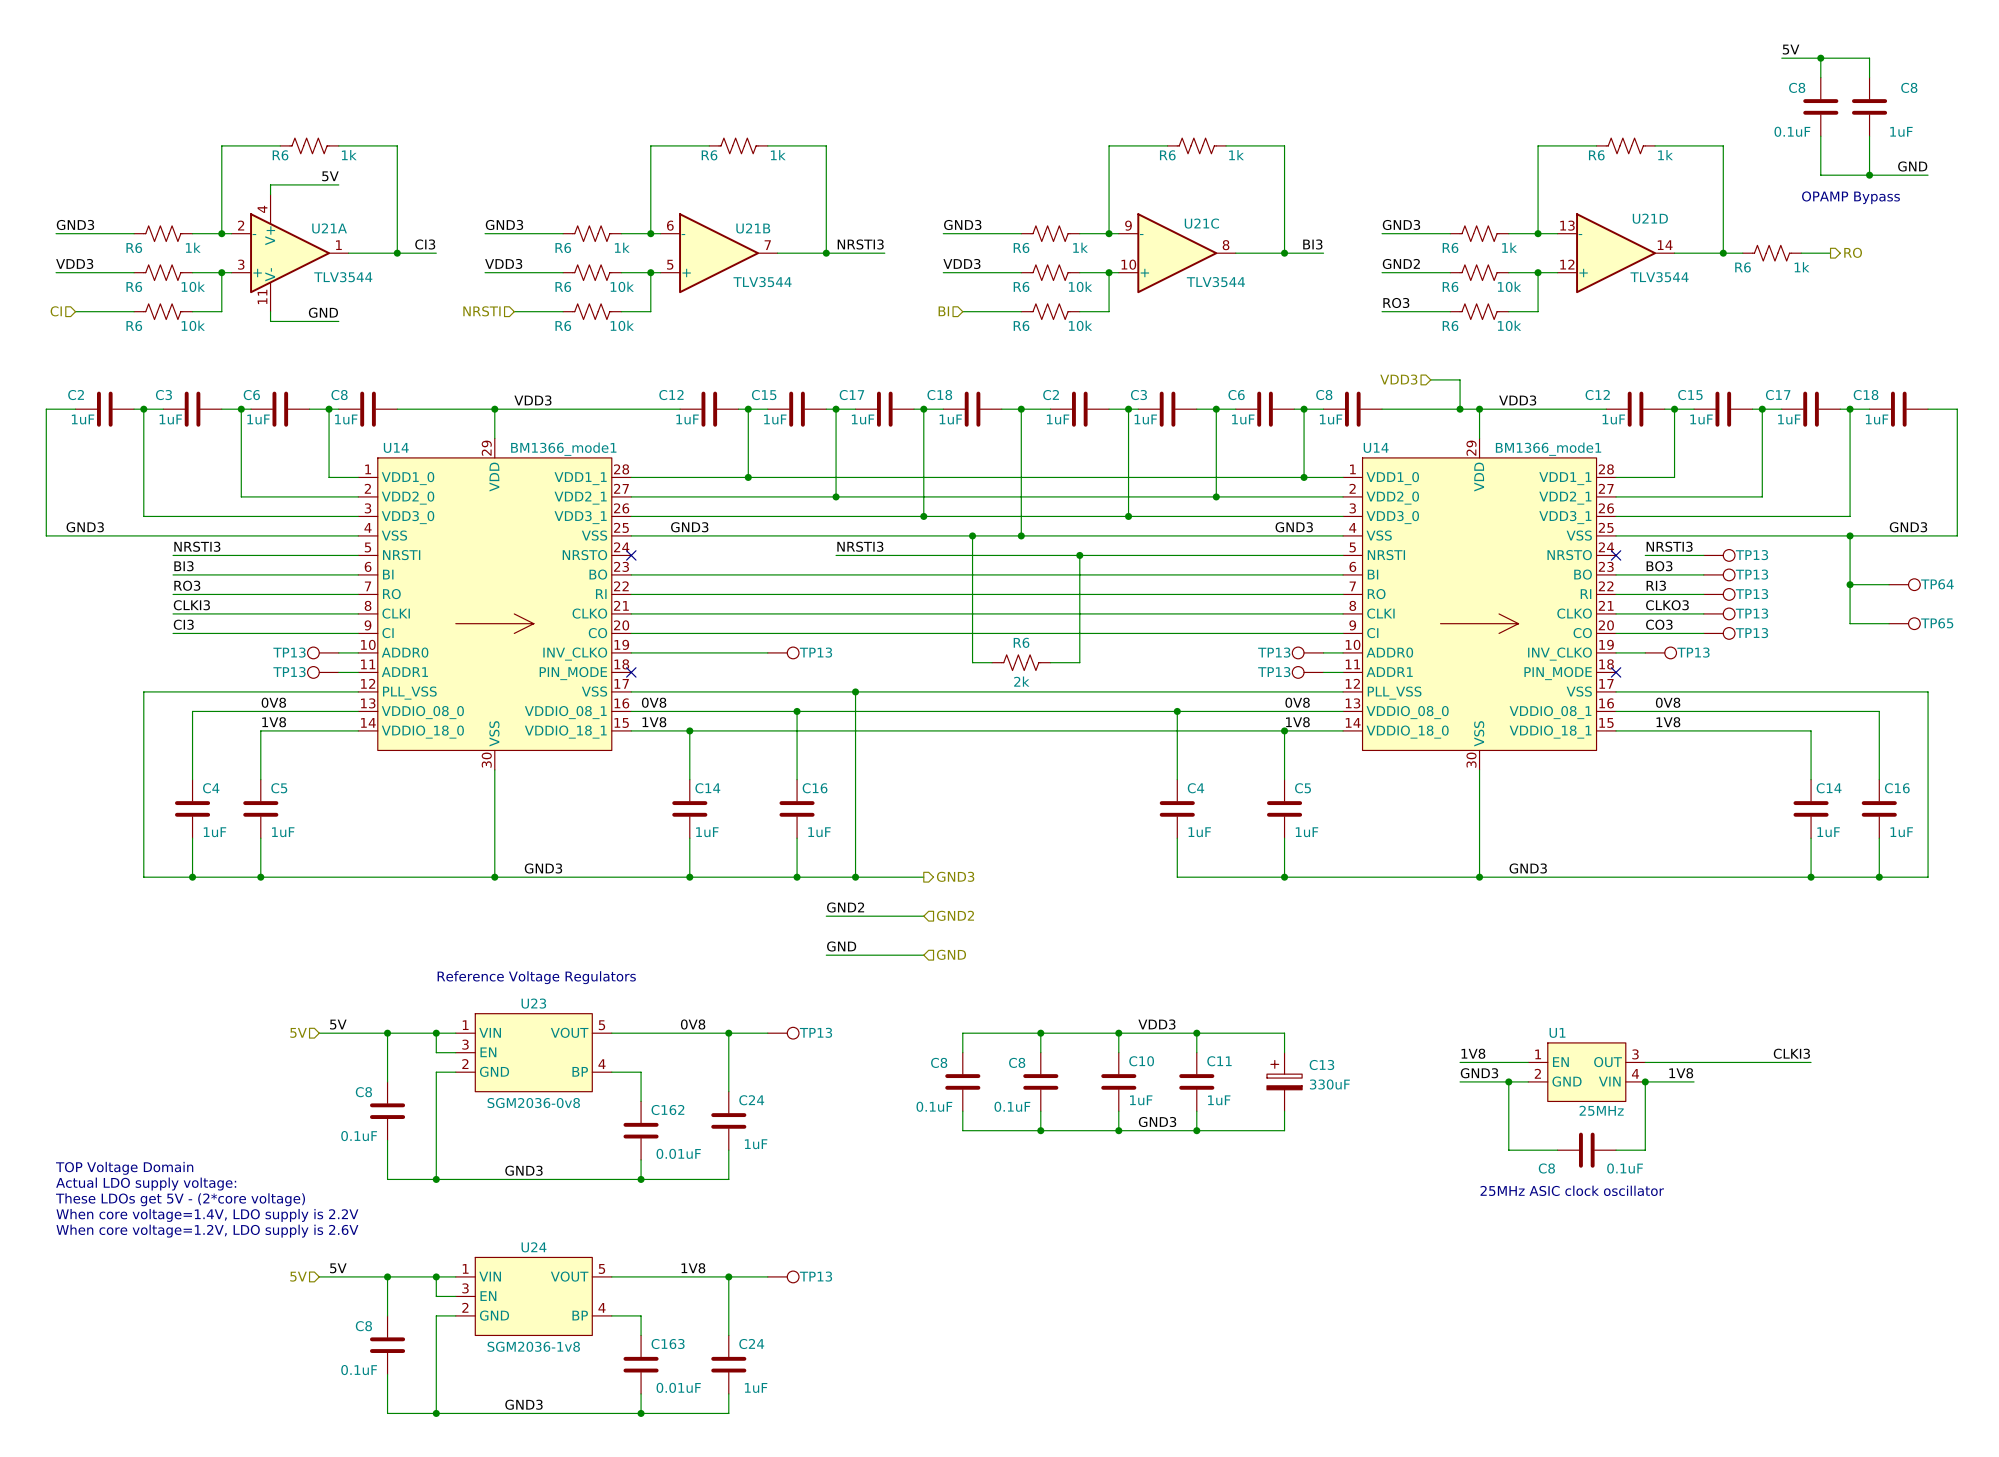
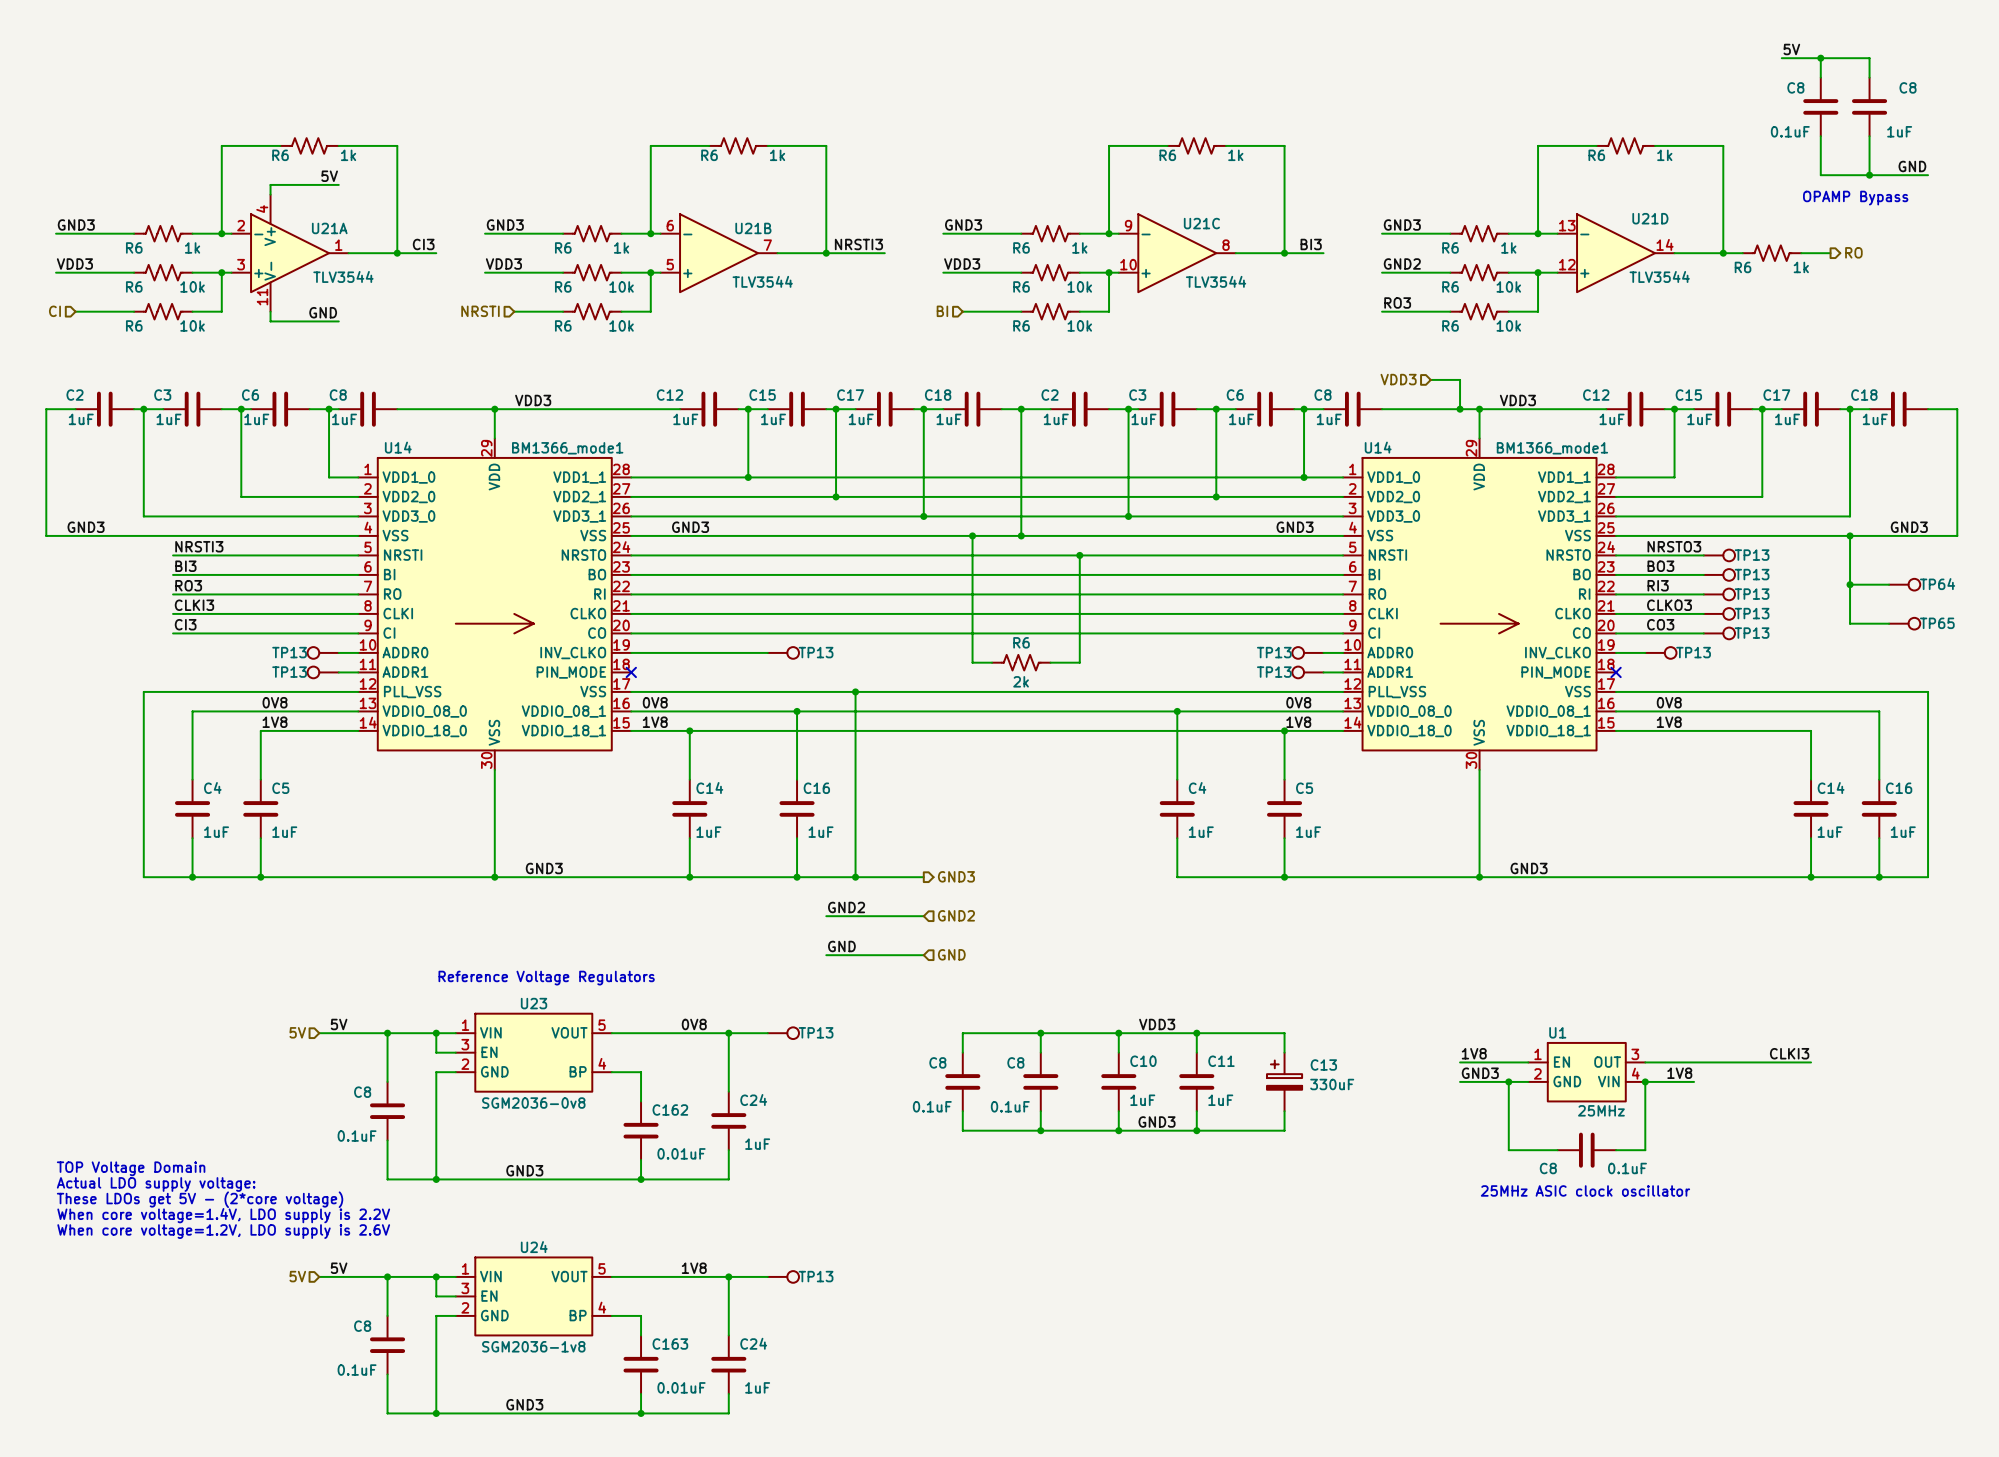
label: NRSTI3 (860, 546) -> none
label: NRSTI3 (1669, 546) -> NRSTO3 (1674, 546)
wire: none -> (631, 555) (836, 555)
no-connect mark: (631, 555) -> none
wire: none -> (1616, 555) (1645, 555)
no-connect mark: (1616, 555) -> none

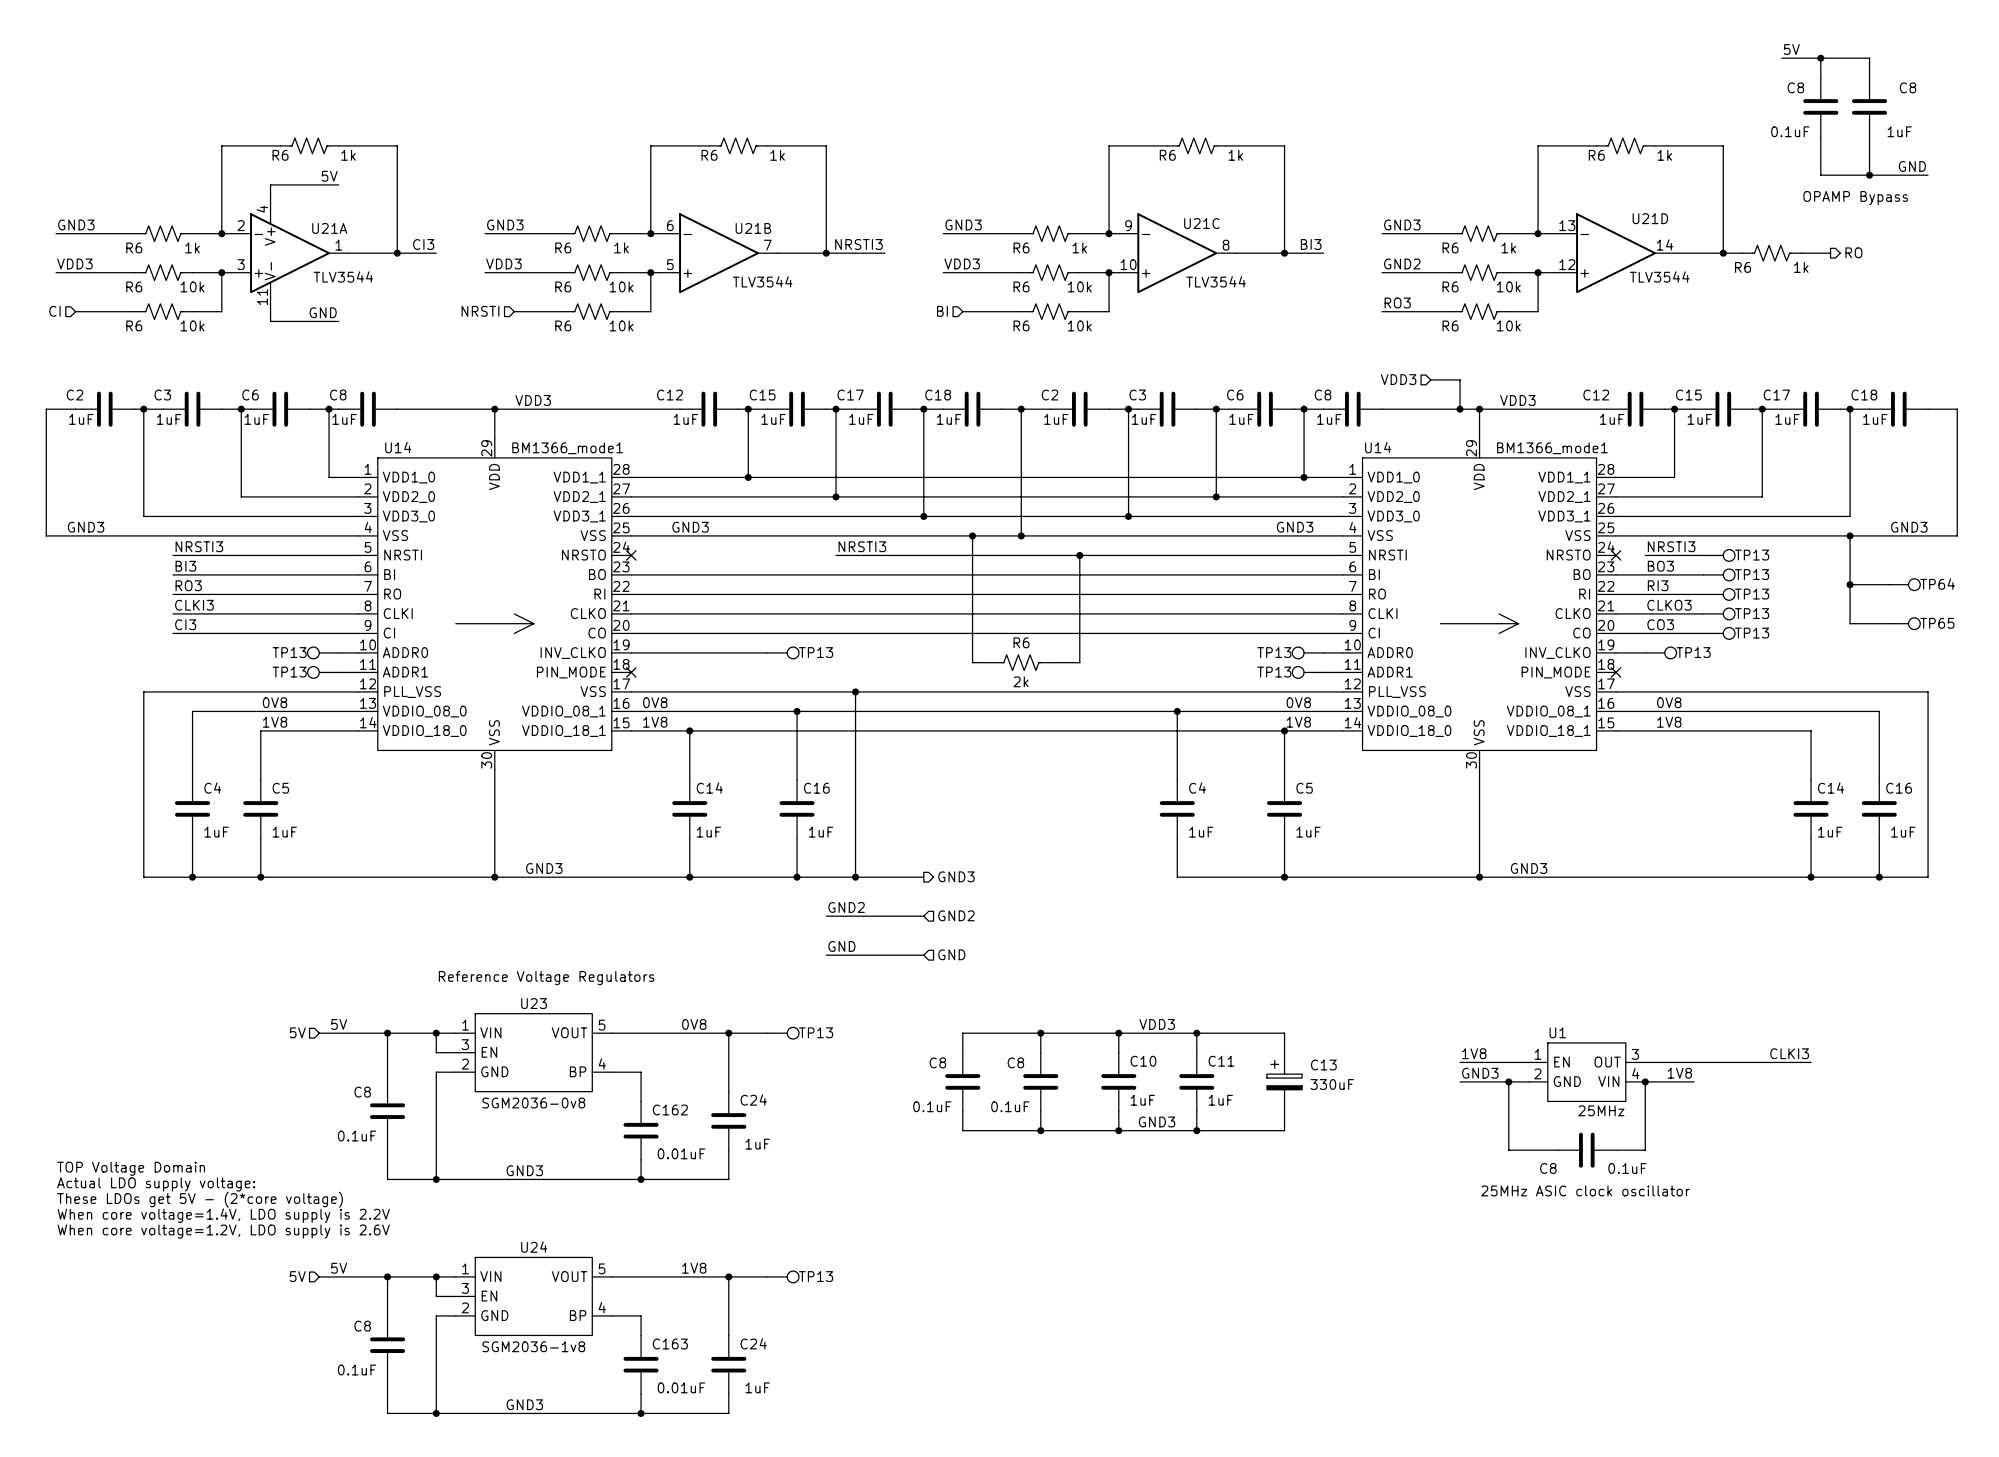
label: none -> NRSTI3 (862, 546)
label: NRSTO3 (1674, 546) -> NRSTI3 (1671, 546)
wire: (631, 555) (836, 555) -> none
no-connect mark: none -> (631, 555)
wire: (1616, 555) (1645, 555) -> none
no-connect mark: none -> (1616, 555)

